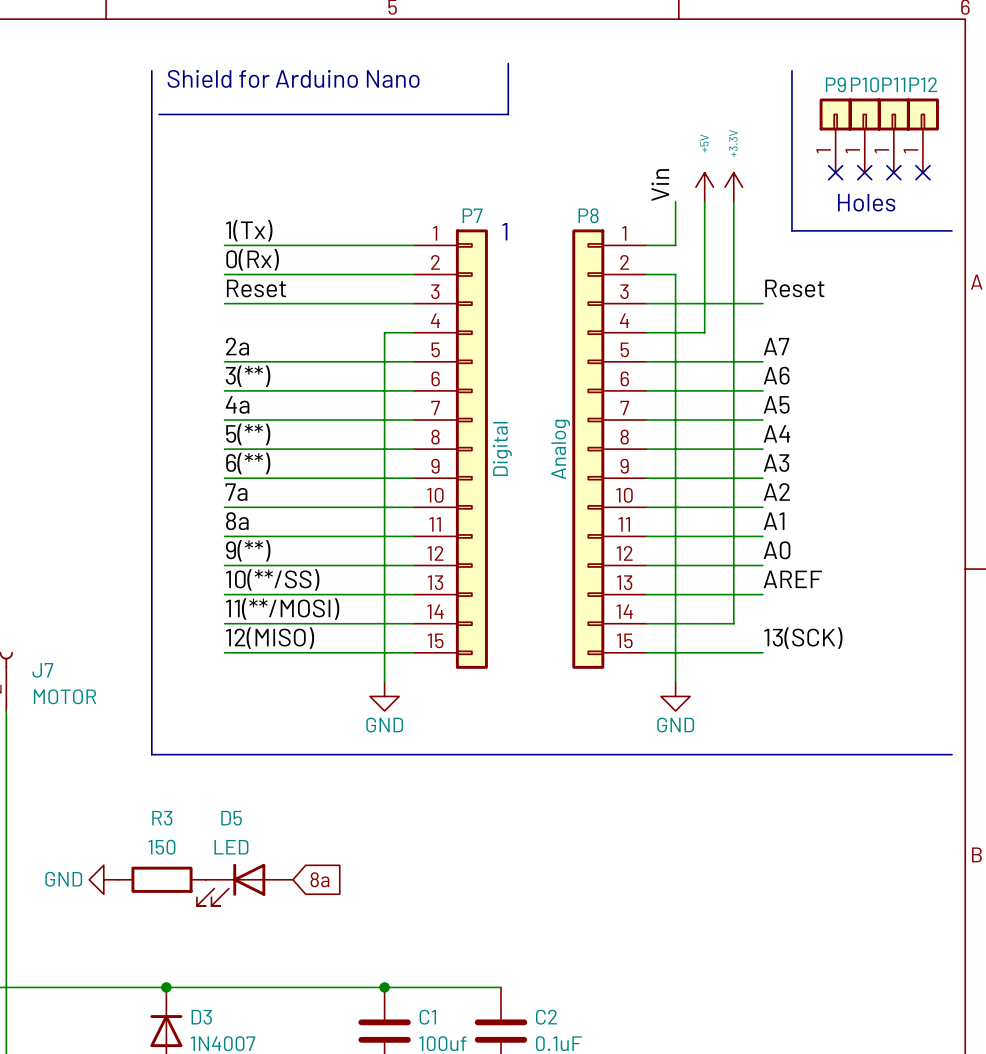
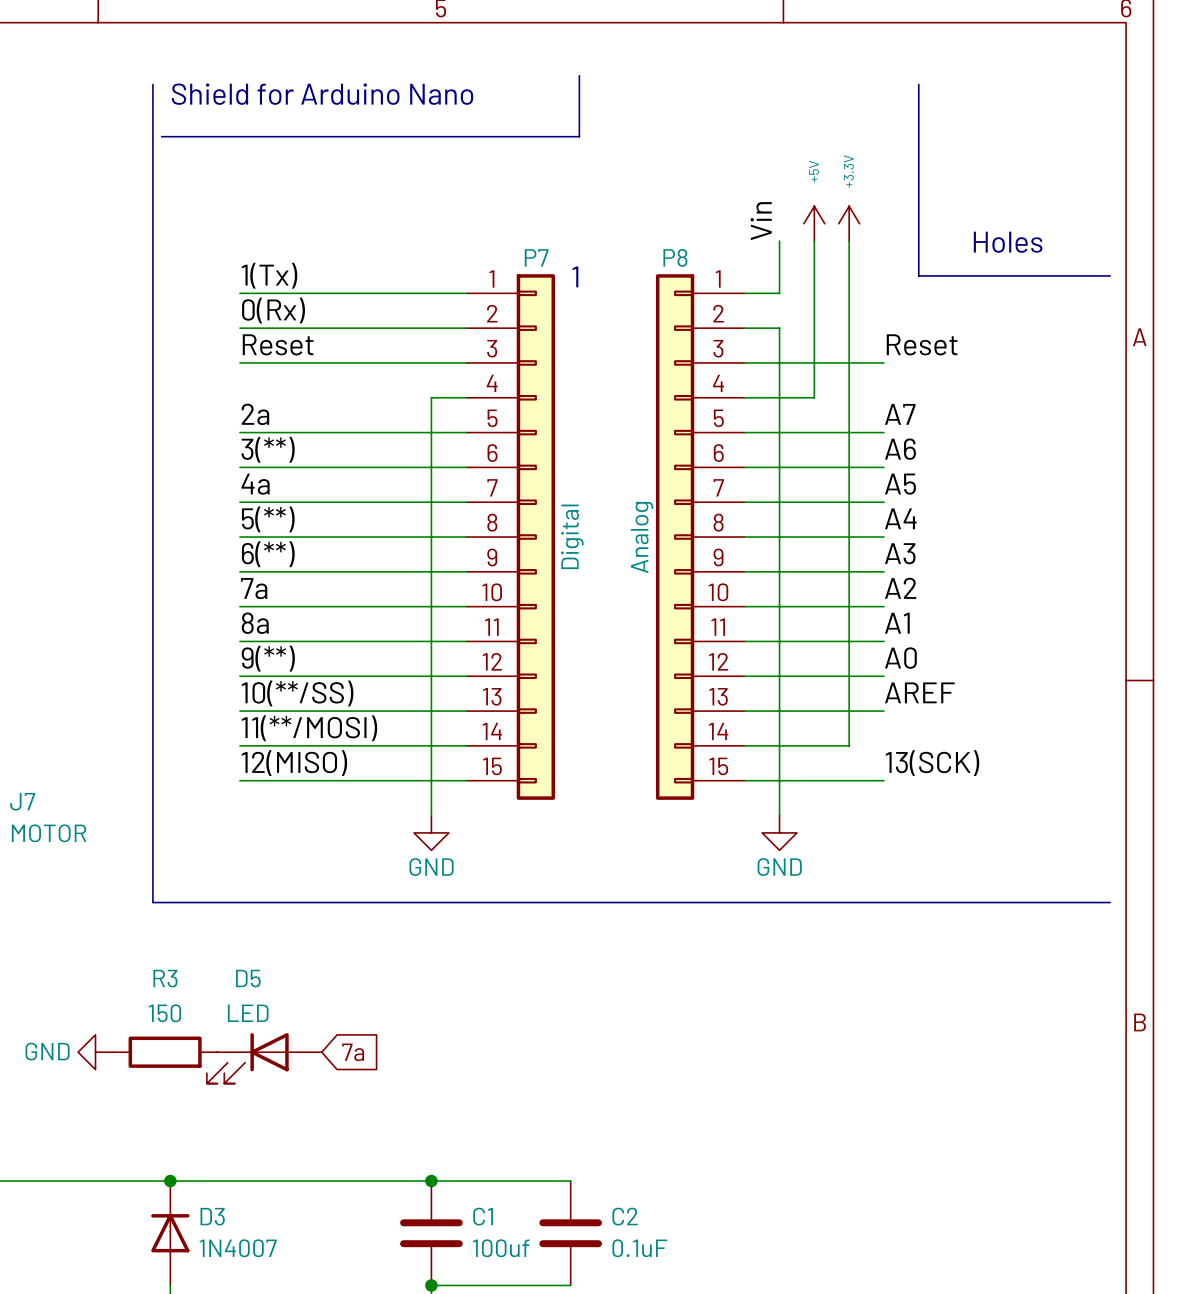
P9: (835, 135) -> none
P10: (864, 135) -> none
P11: (893, 135) -> none
P12: (922, 135) -> none
no-connect mark: (835, 172) -> none
no-connect mark: (864, 172) -> none
no-connect mark: (893, 172) -> none
no-connect mark: (922, 172) -> none
global label: 8a (319, 879) -> 7a (353, 1052)

